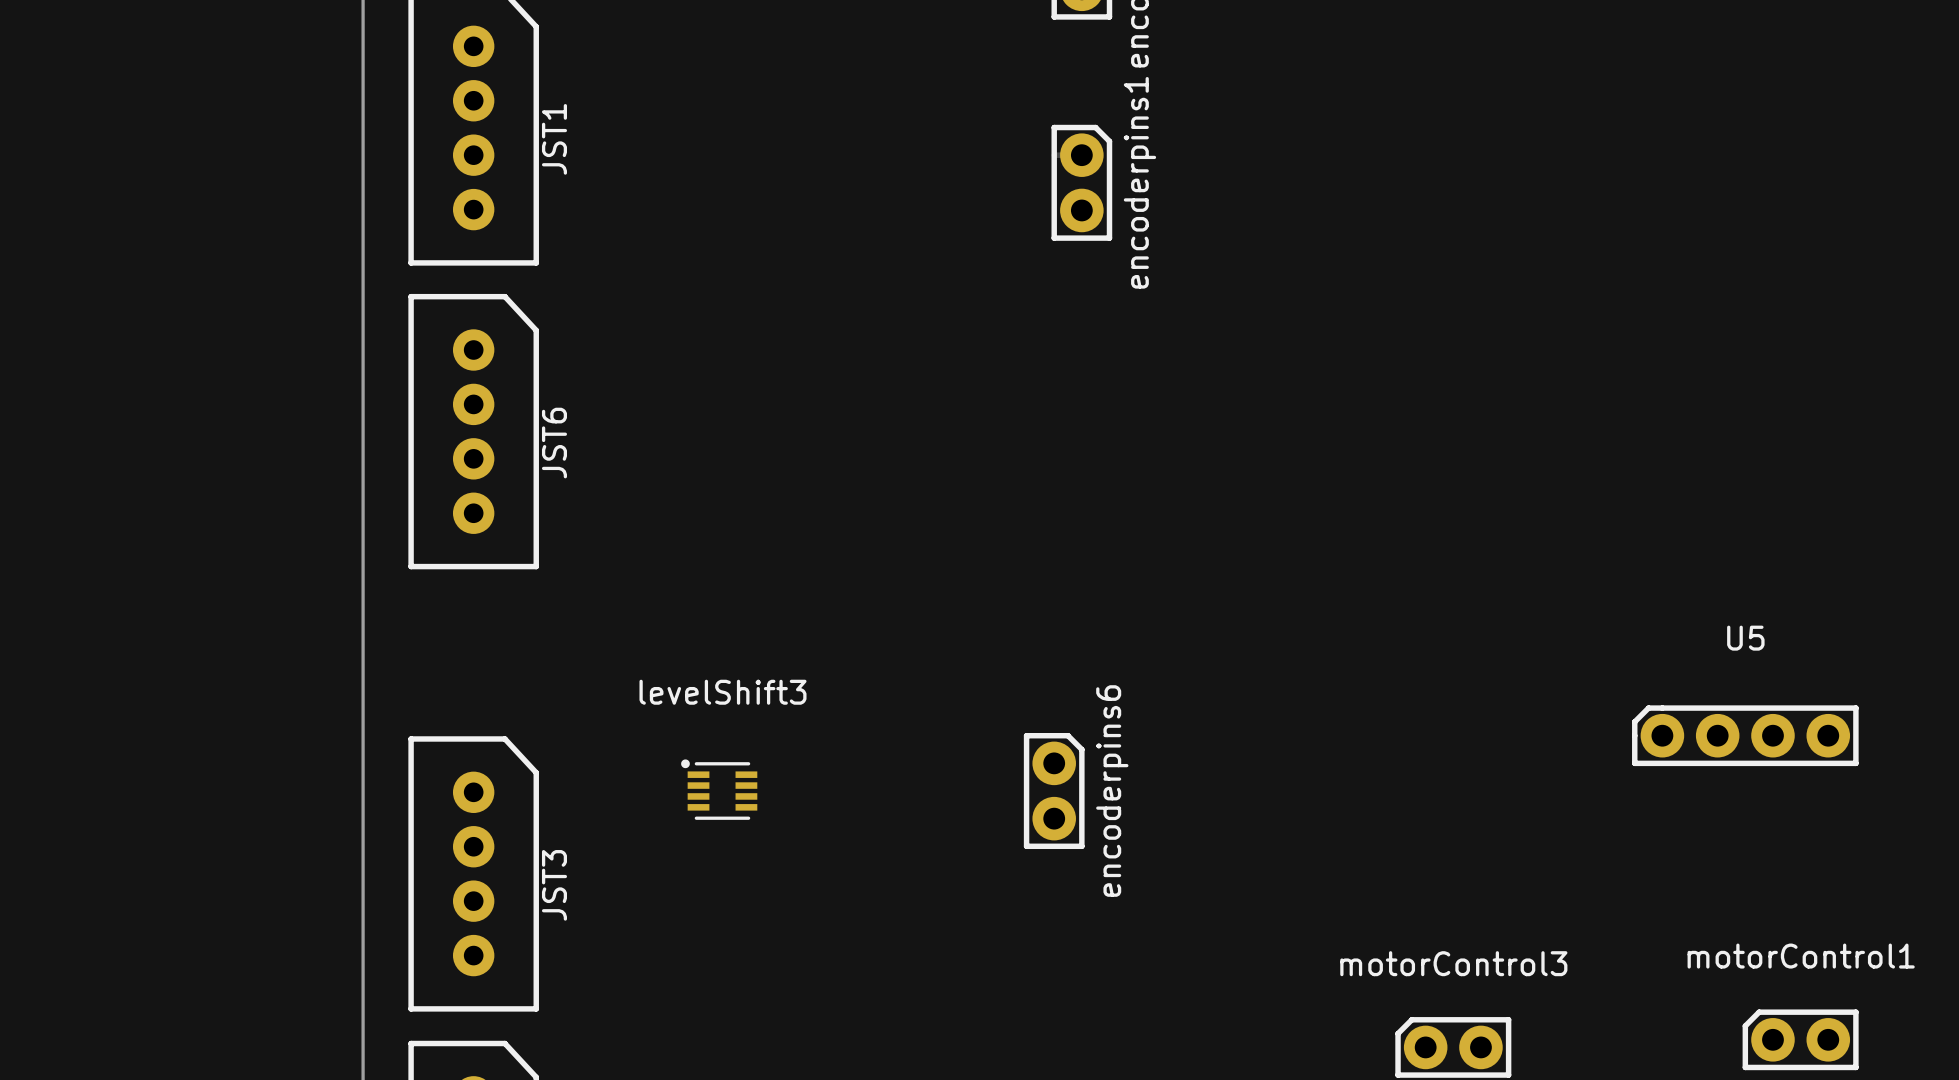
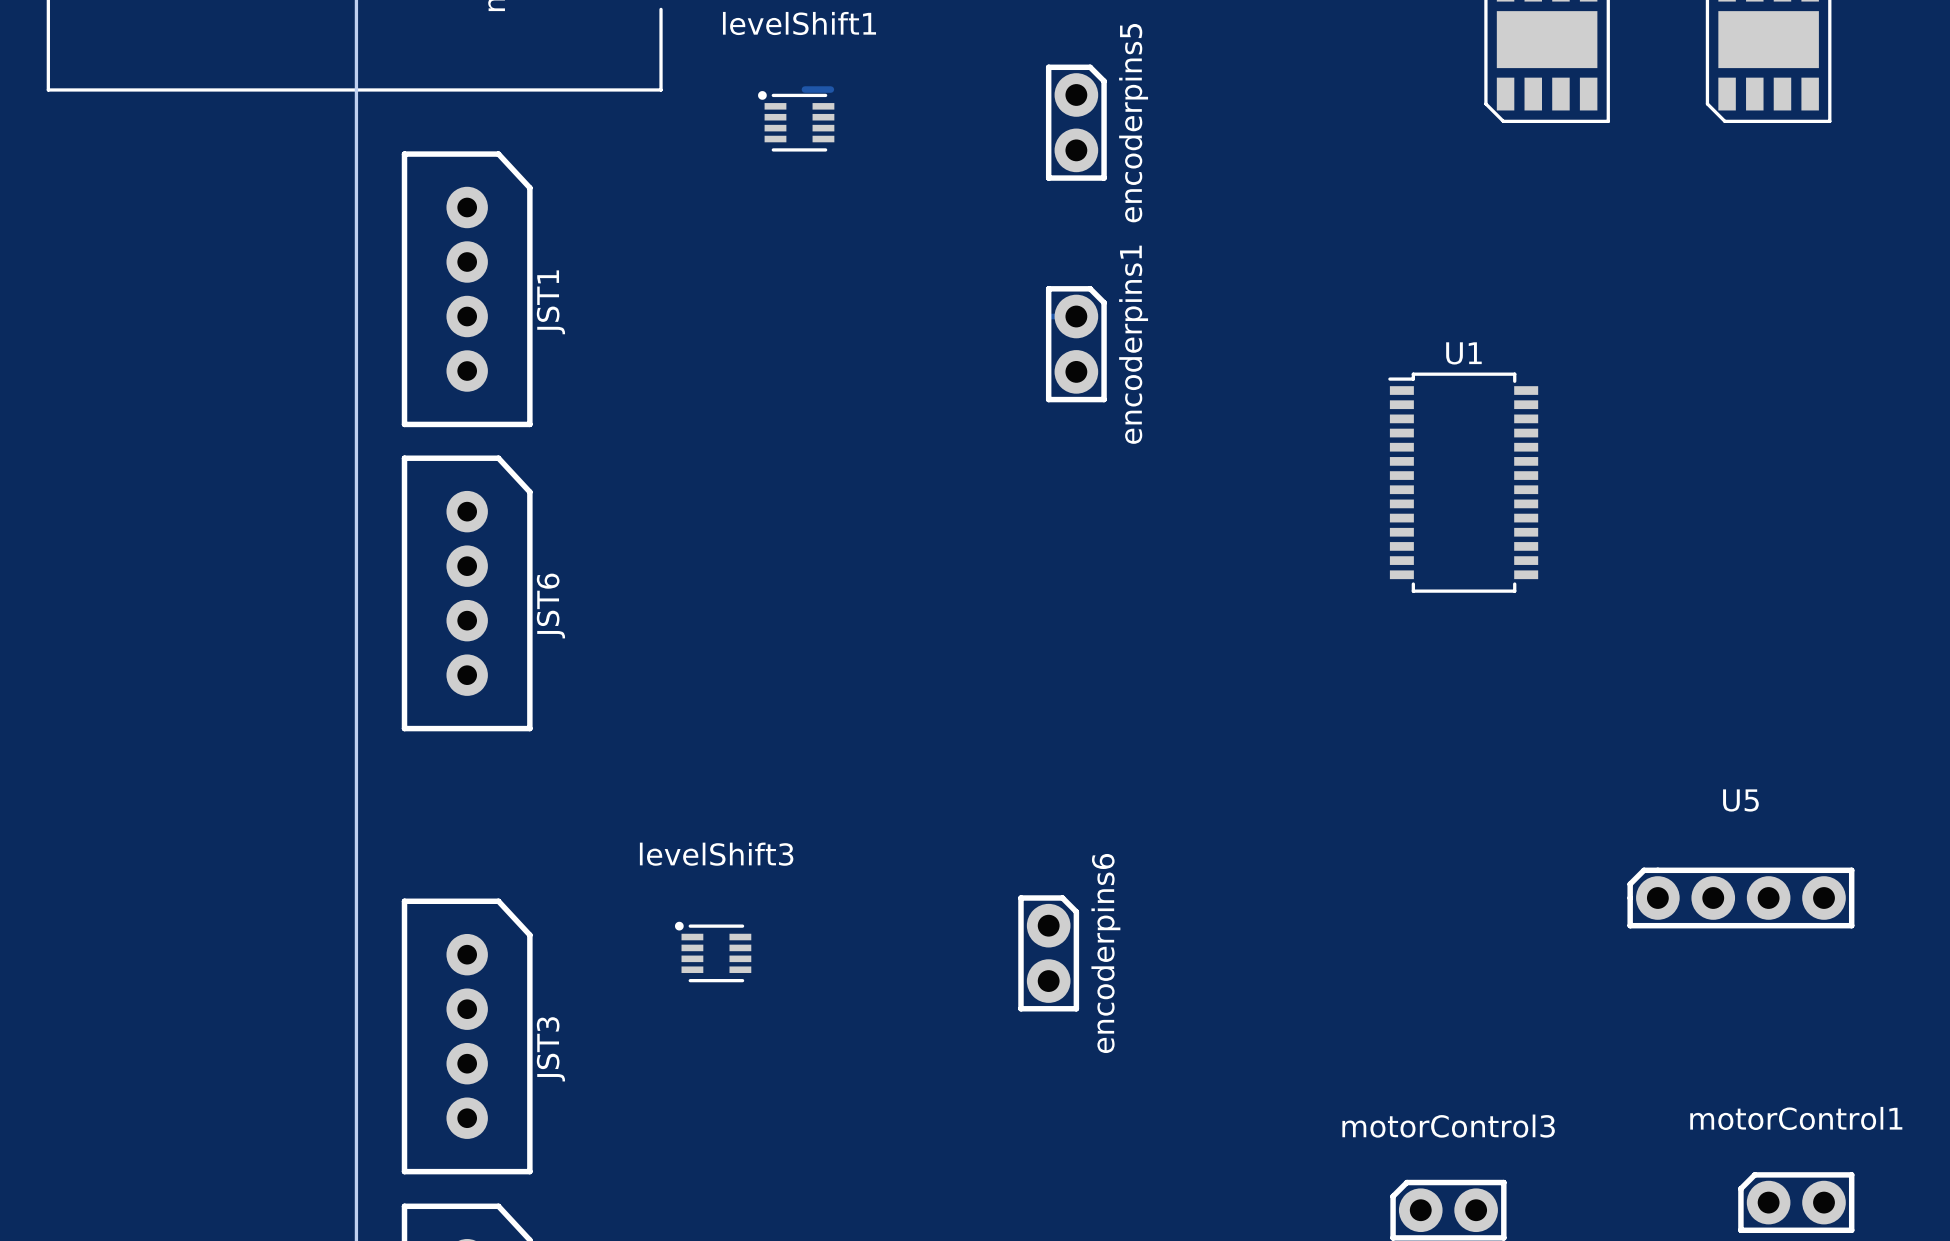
U1: none -> (1463, 482)

